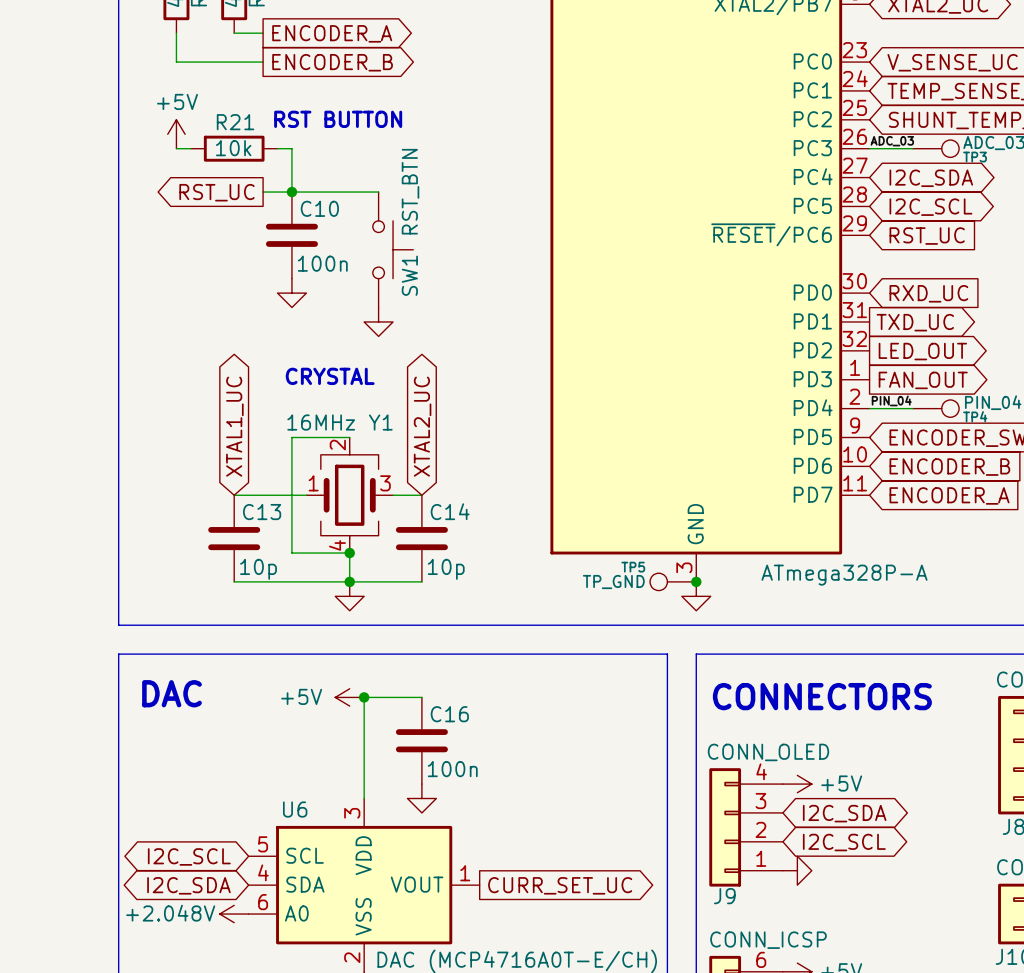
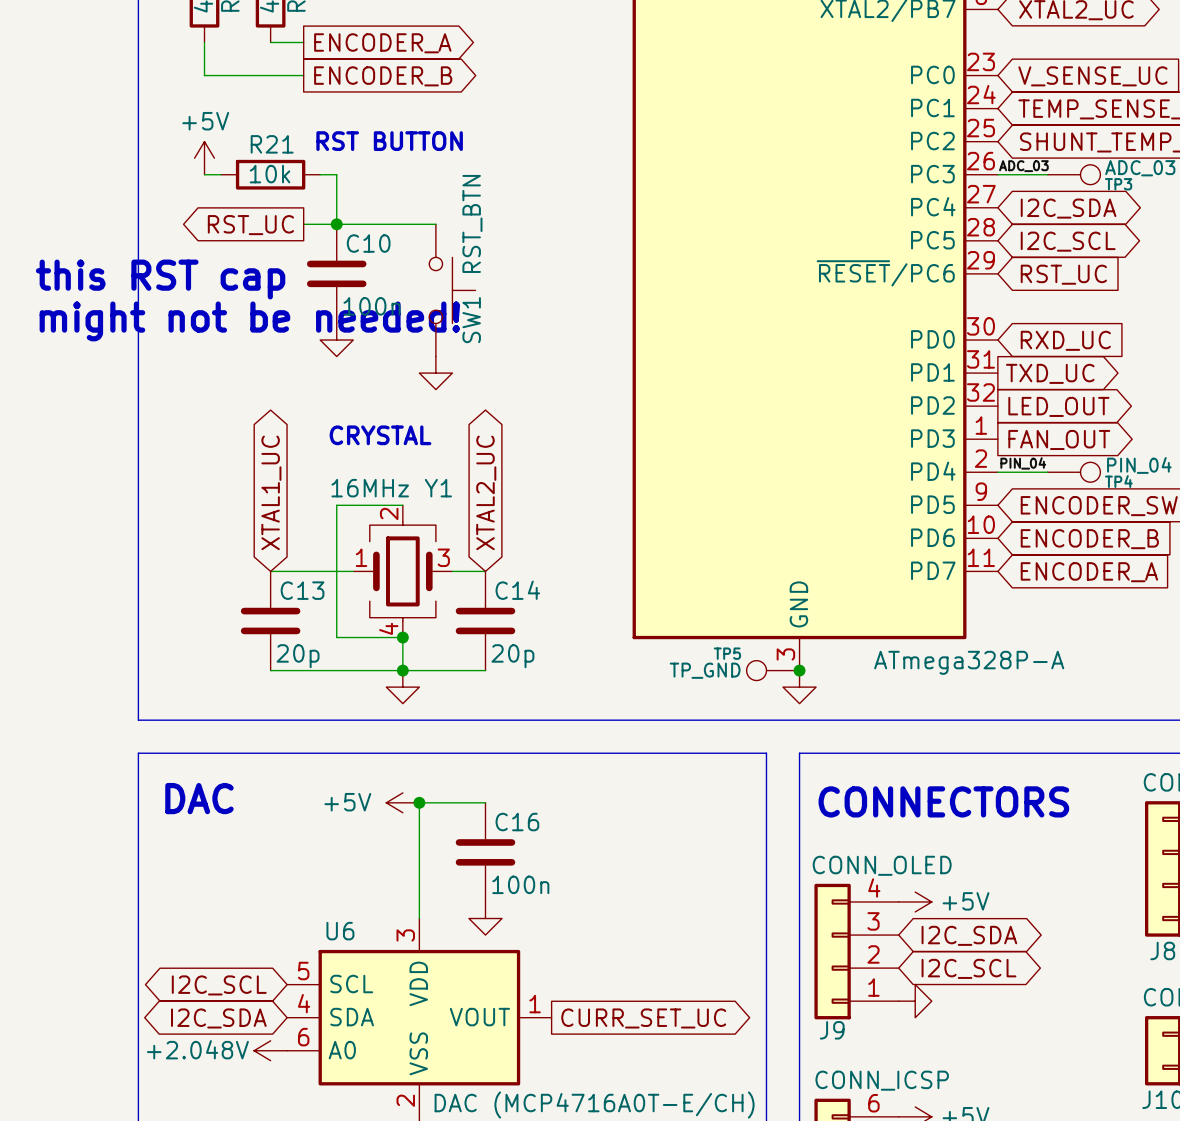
text: none -> this RST cap (160, 279)
text: none -> might not be needed! (249, 321)
C13 value: 10p (258, 569) -> 20p (298, 656)
C14 value: 10p (446, 569) -> 20p (512, 656)

